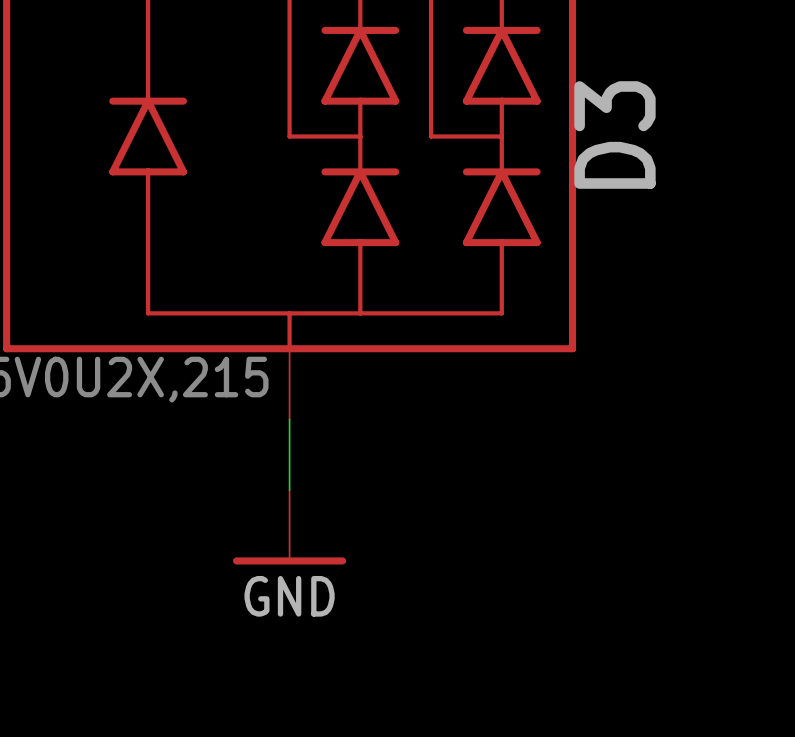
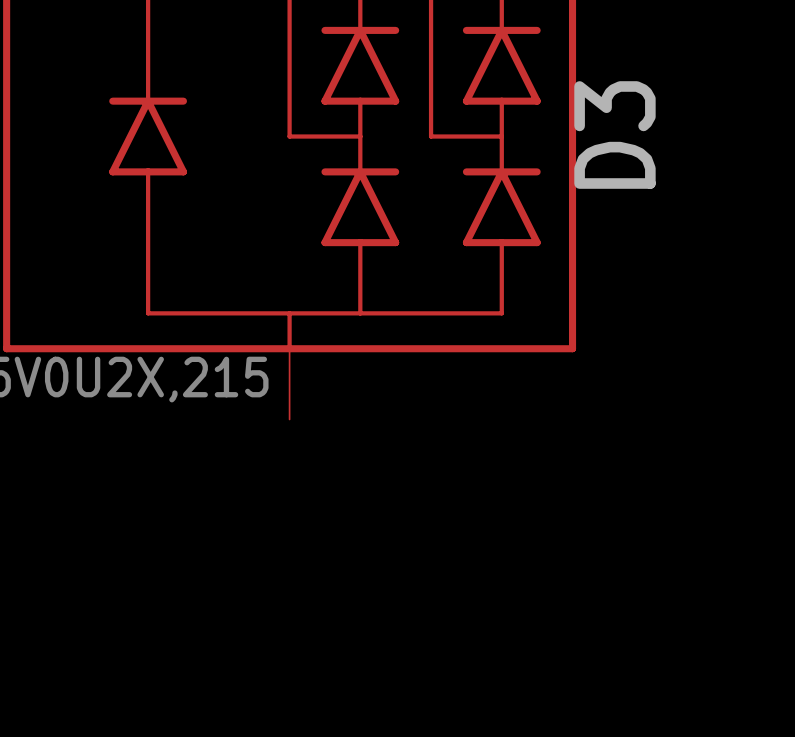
wire: (289, 419) (289, 490) -> none
power symbol: GND (289, 527) -> none

